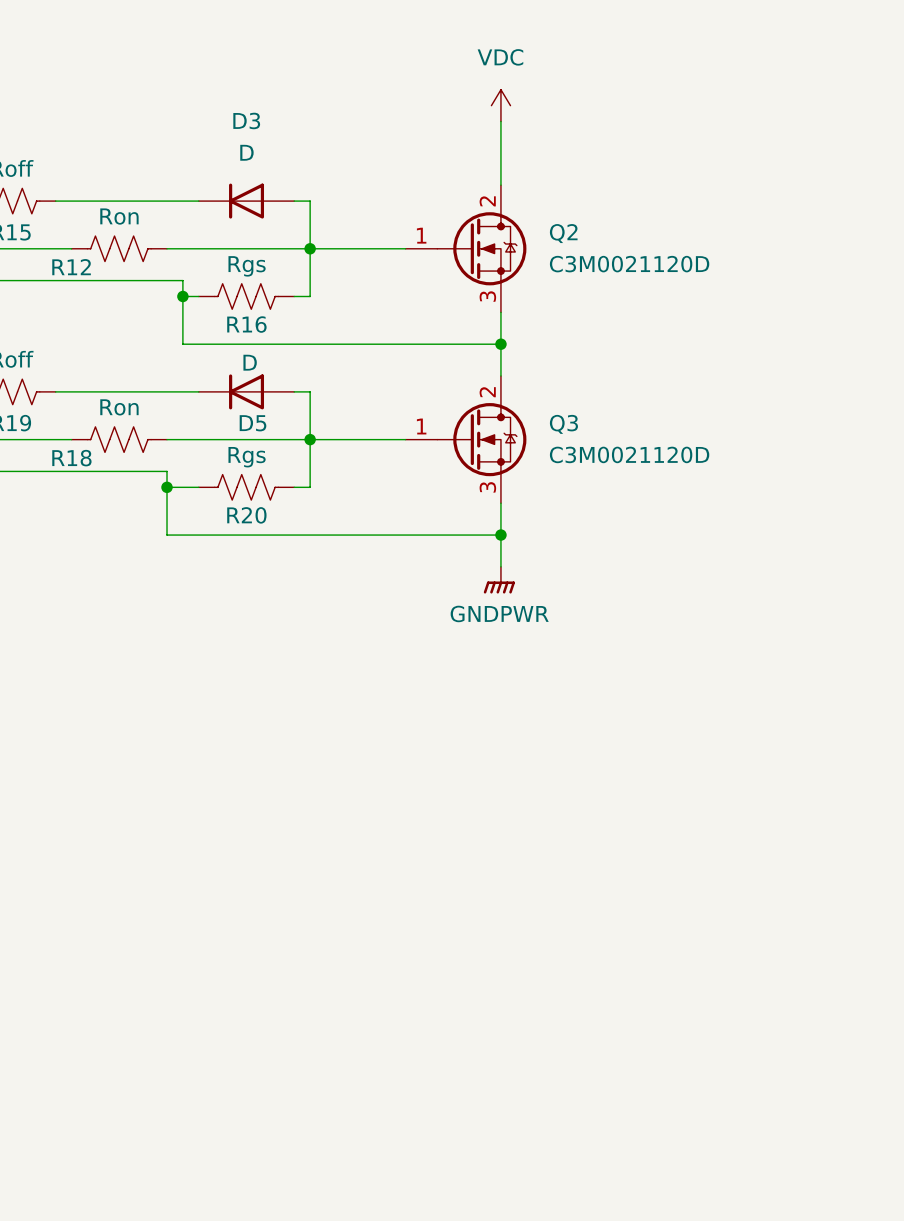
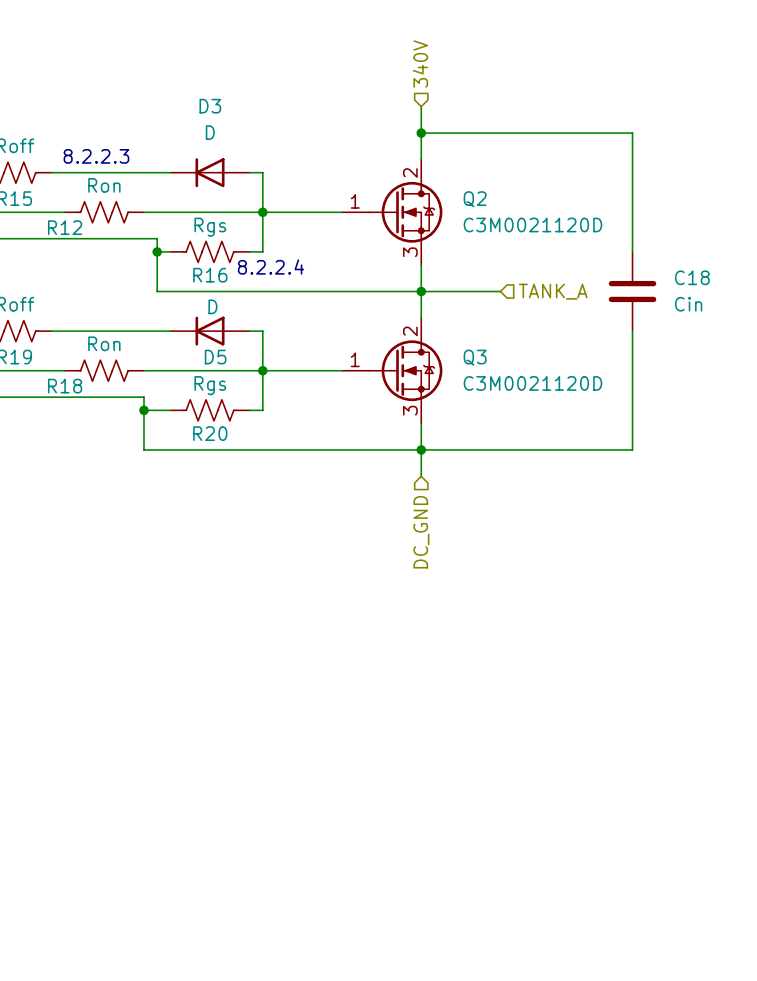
hierarchical label: none -> 340V (420, 64)
power symbol: VDC (500, 105) -> none
wire: none -> (421, 133) (632, 133) (632, 251)
junction: none -> (421, 133)
text: none -> 8.2.2.3 (96, 156)
text: none -> 8.2.2.4 (271, 266)
wire: none -> (421, 291) (500, 291)
C18: none -> Cin (632, 291)
hierarchical label: none -> TANK_A (553, 291)
wire: none -> (632, 331) (632, 449) (421, 449)
power symbol: GNDPWR (499, 580) -> none
hierarchical label: none -> DC_GND (421, 532)

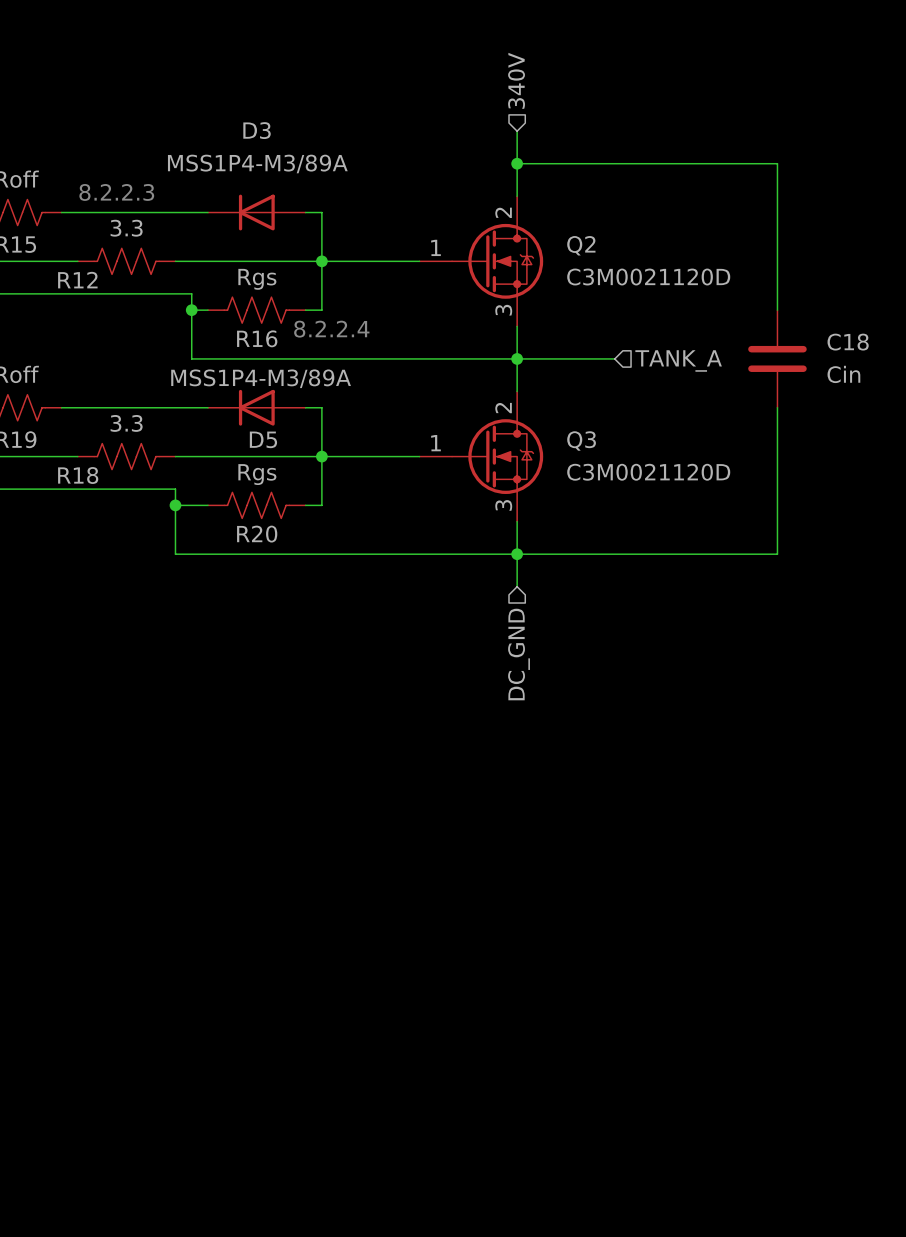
D3 value: D (210, 132) -> MSS1P4-M3/89A (257, 164)
R12 value: Ron (104, 185) -> 3.3 (126, 228)
D5 value: D (212, 306) -> MSS1P4-M3/89A (261, 378)
R18 value: Ron (104, 343) -> 3.3 (126, 423)

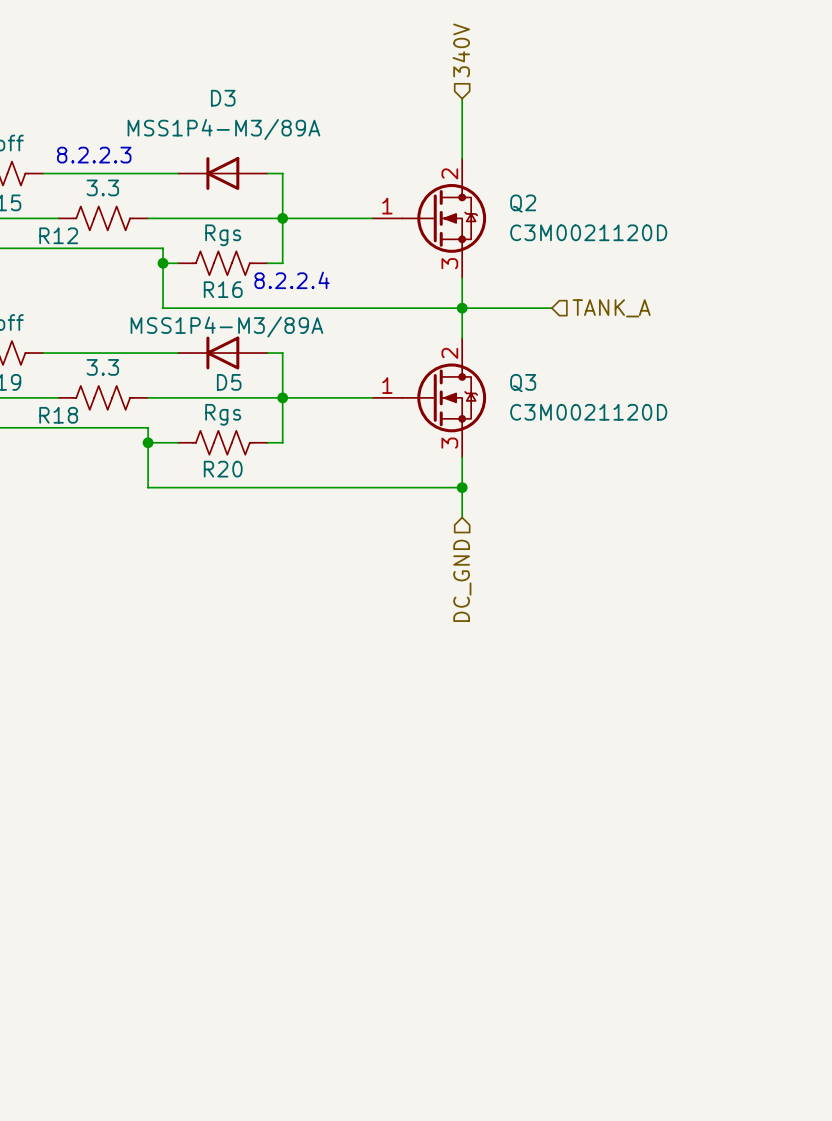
wire: (517, 163) (777, 163) (777, 310) -> none
junction: (517, 163) -> none
C18: Cin (777, 358) -> none
wire: (777, 407) (777, 554) (517, 554) -> none

